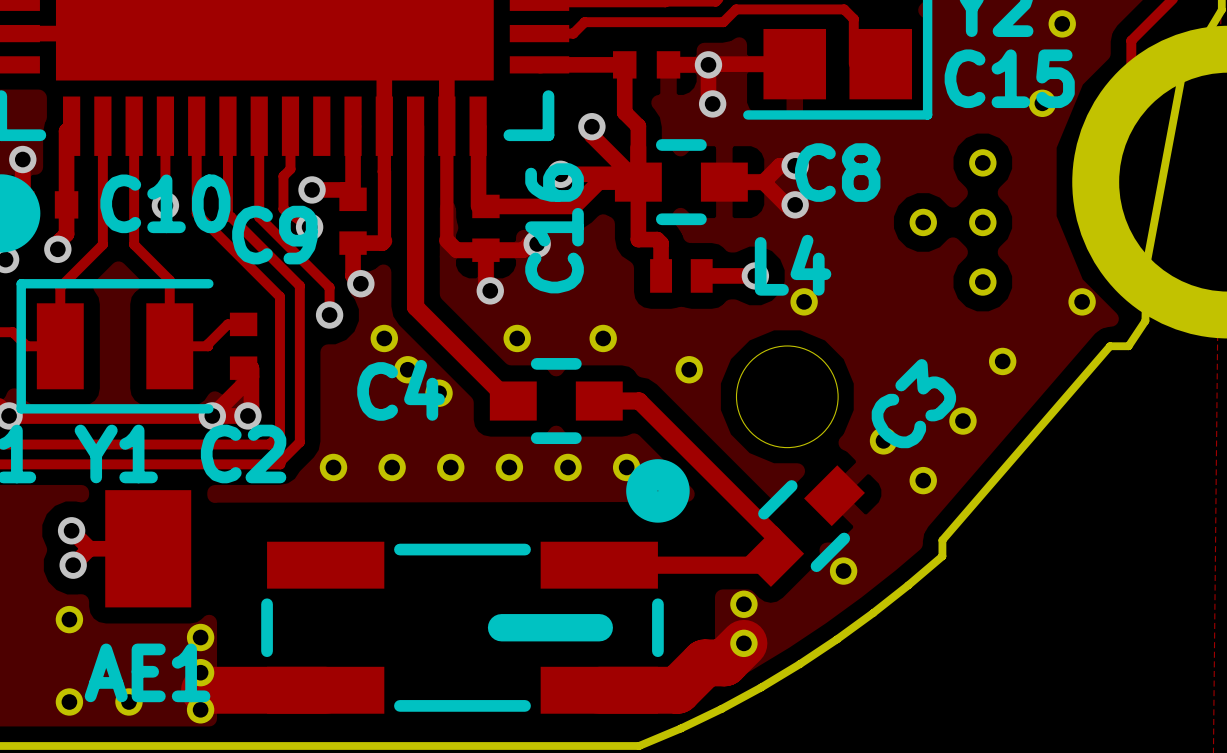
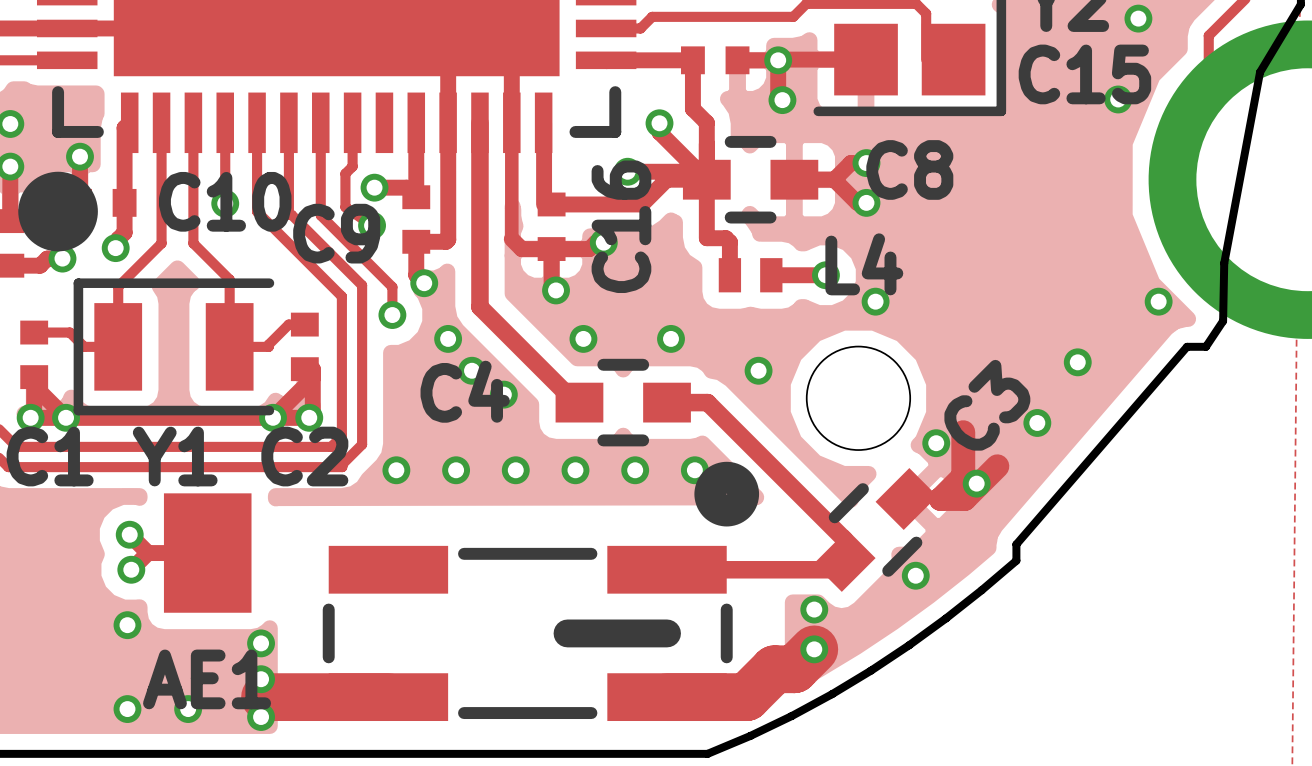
part: (982, 162) -> none
part: (923, 222) -> none
part: (982, 222) -> none
part: (982, 282) -> none
track: none -> (963, 432) (963, 476) (940, 499) (964, 499) (997, 466)
via: none -> (936, 443)
part: (883, 440) -> none
via: none -> (976, 483)
part: (923, 480) -> none

